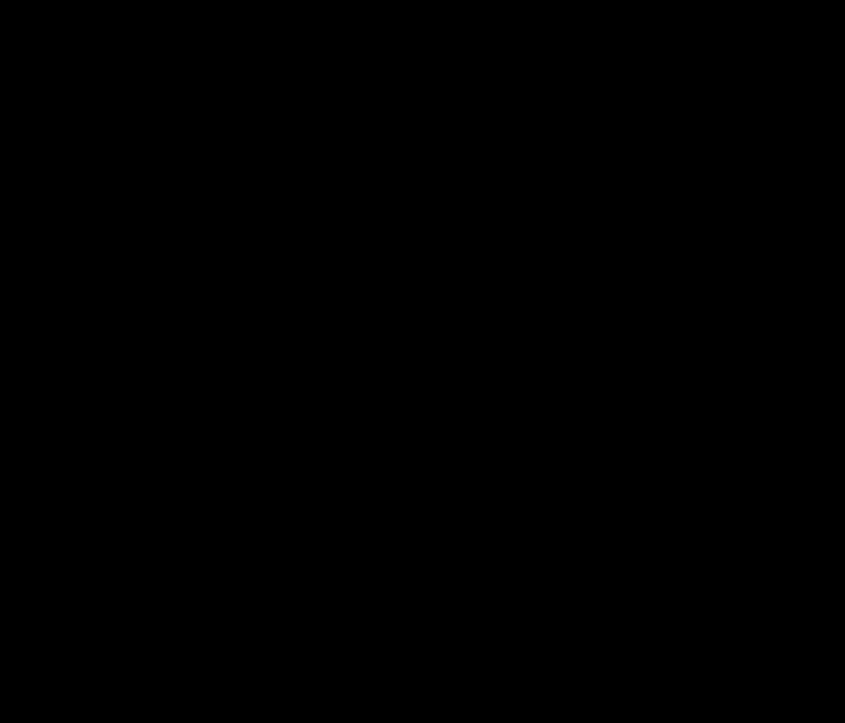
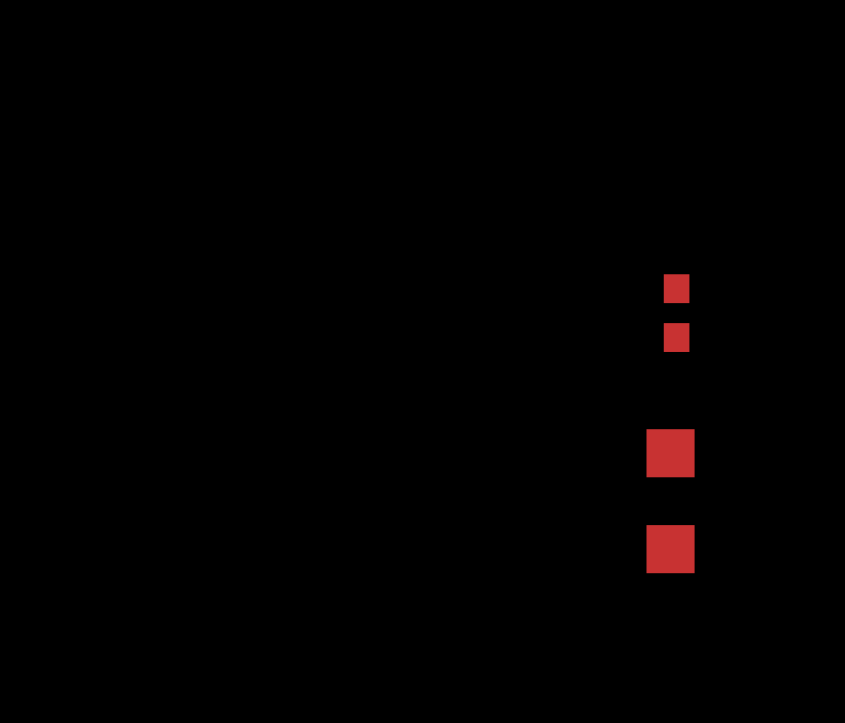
part: none -> (676, 313)
part: none -> (670, 501)

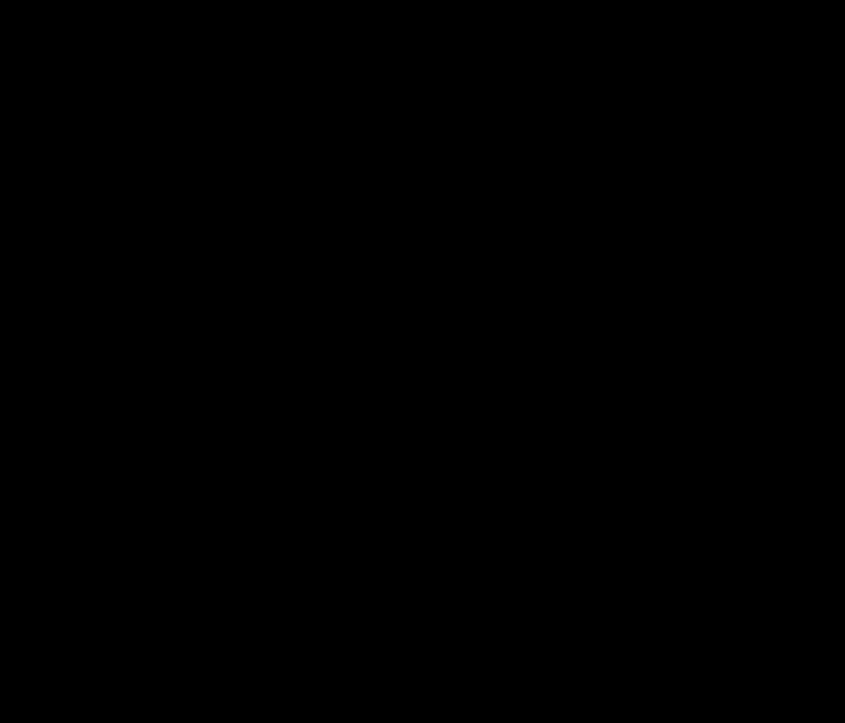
part: (676, 313) -> none
part: (670, 501) -> none

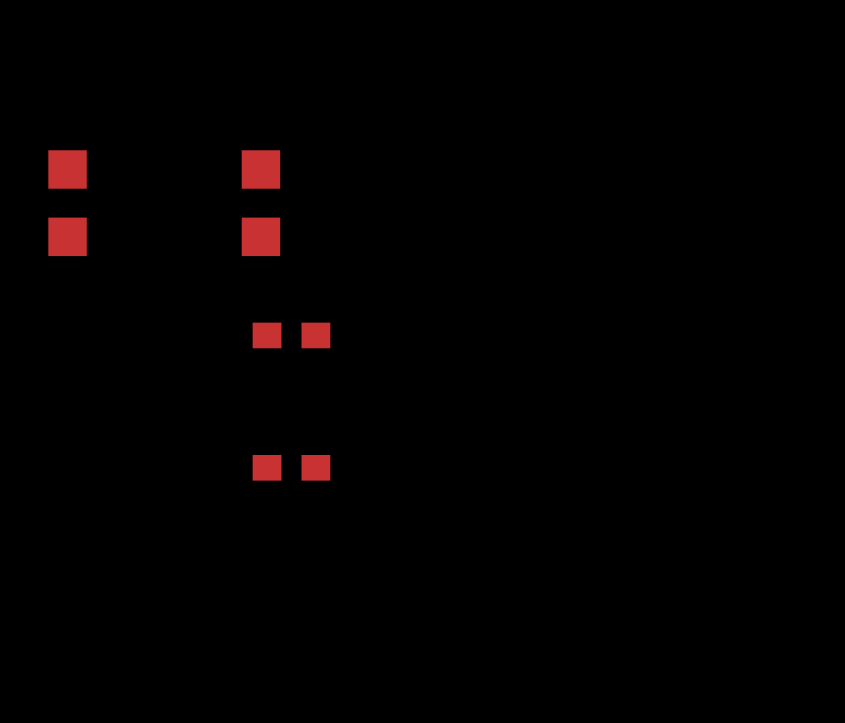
part: none -> (67, 203)
part: none -> (260, 203)
part: none -> (291, 335)
part: none -> (291, 467)

